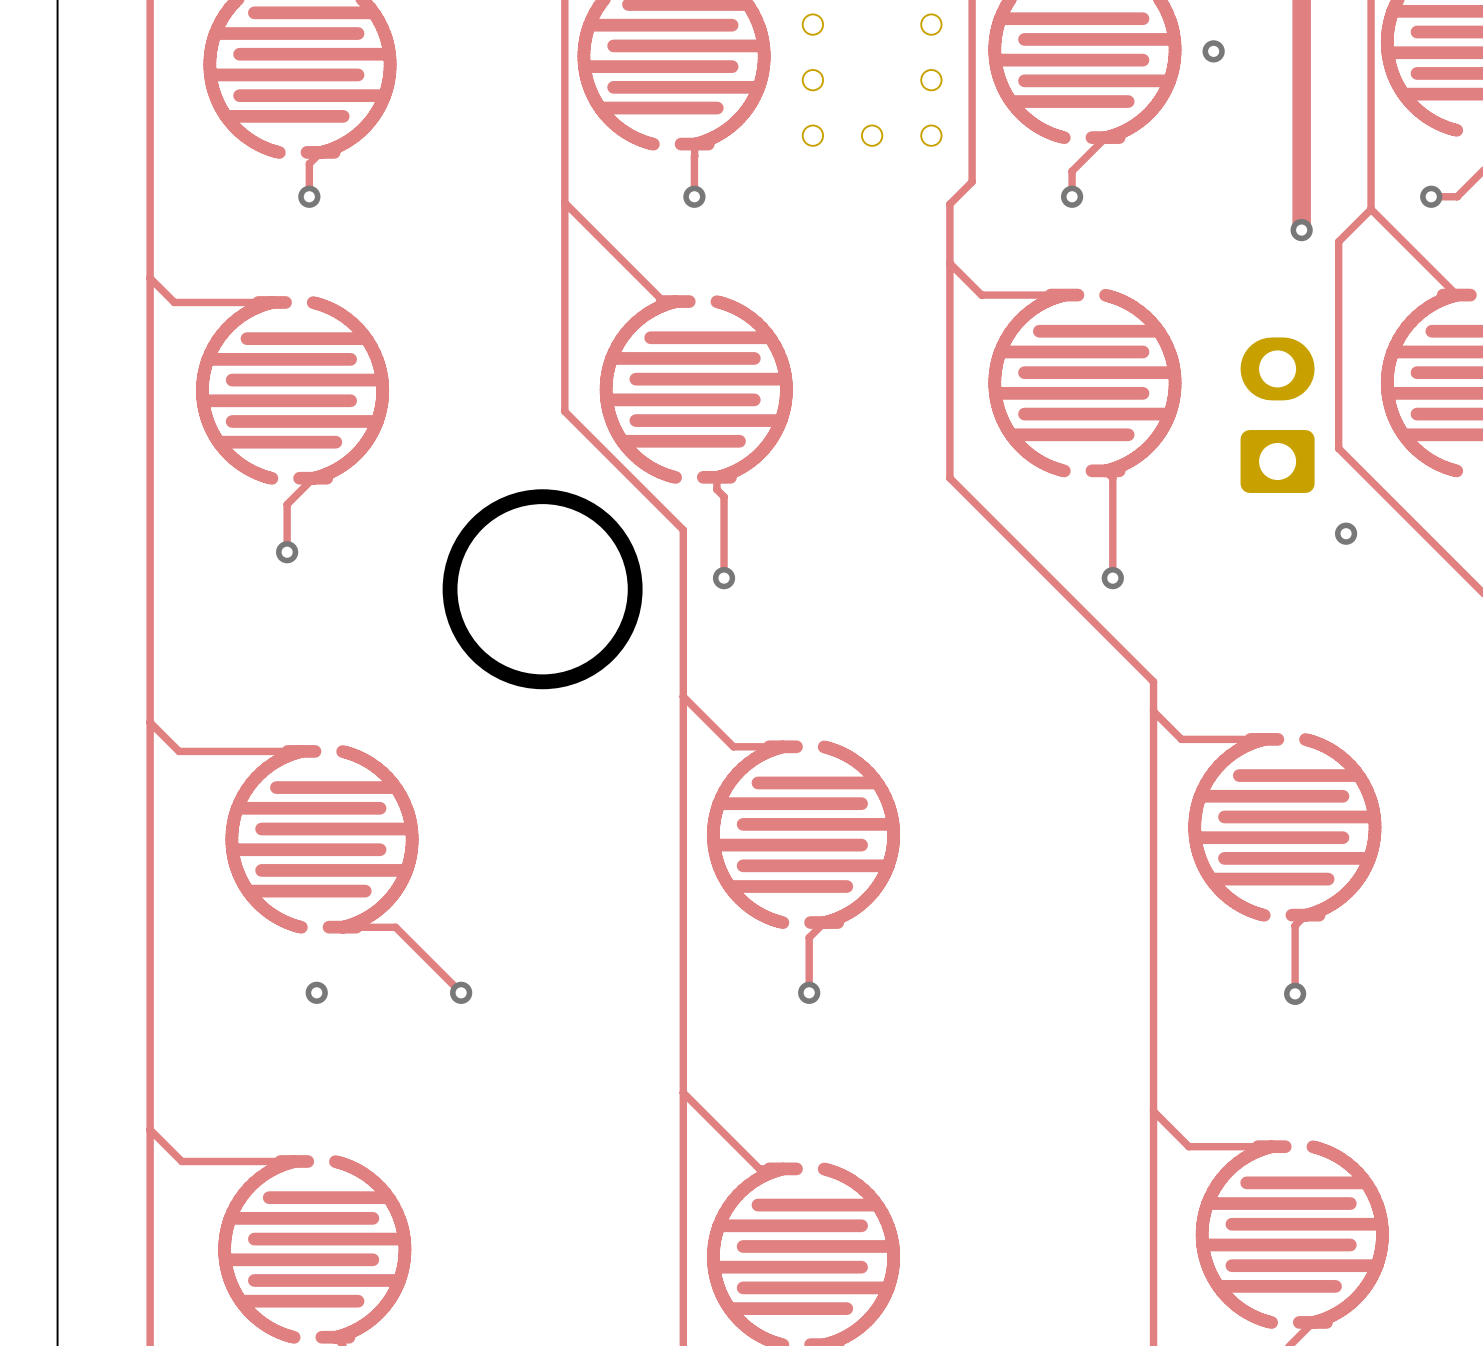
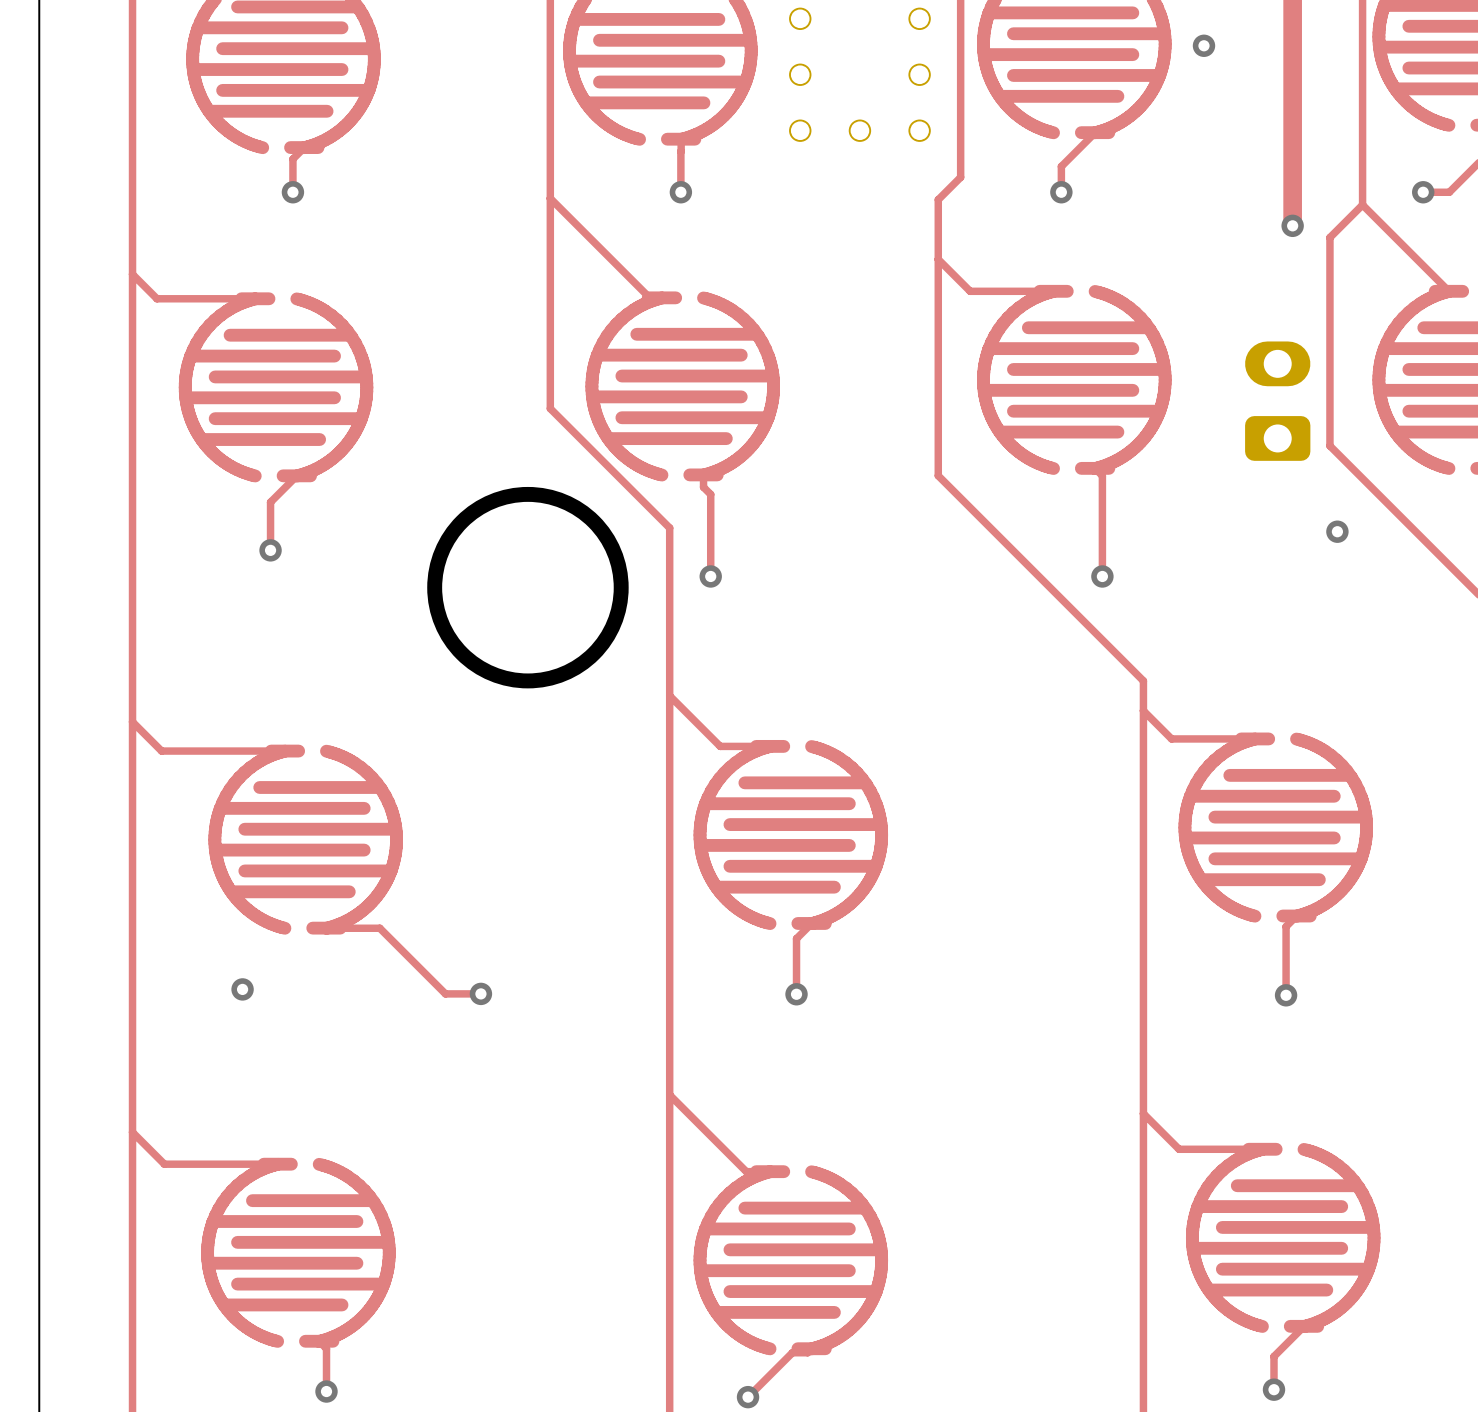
part footprint: [1240, 337, 1315, 493] -> [1245, 341, 1311, 461]
via position: (316, 992) -> (242, 989)
track: none -> (445, 993) (480, 993)
via position: (461, 992) -> (480, 993)

